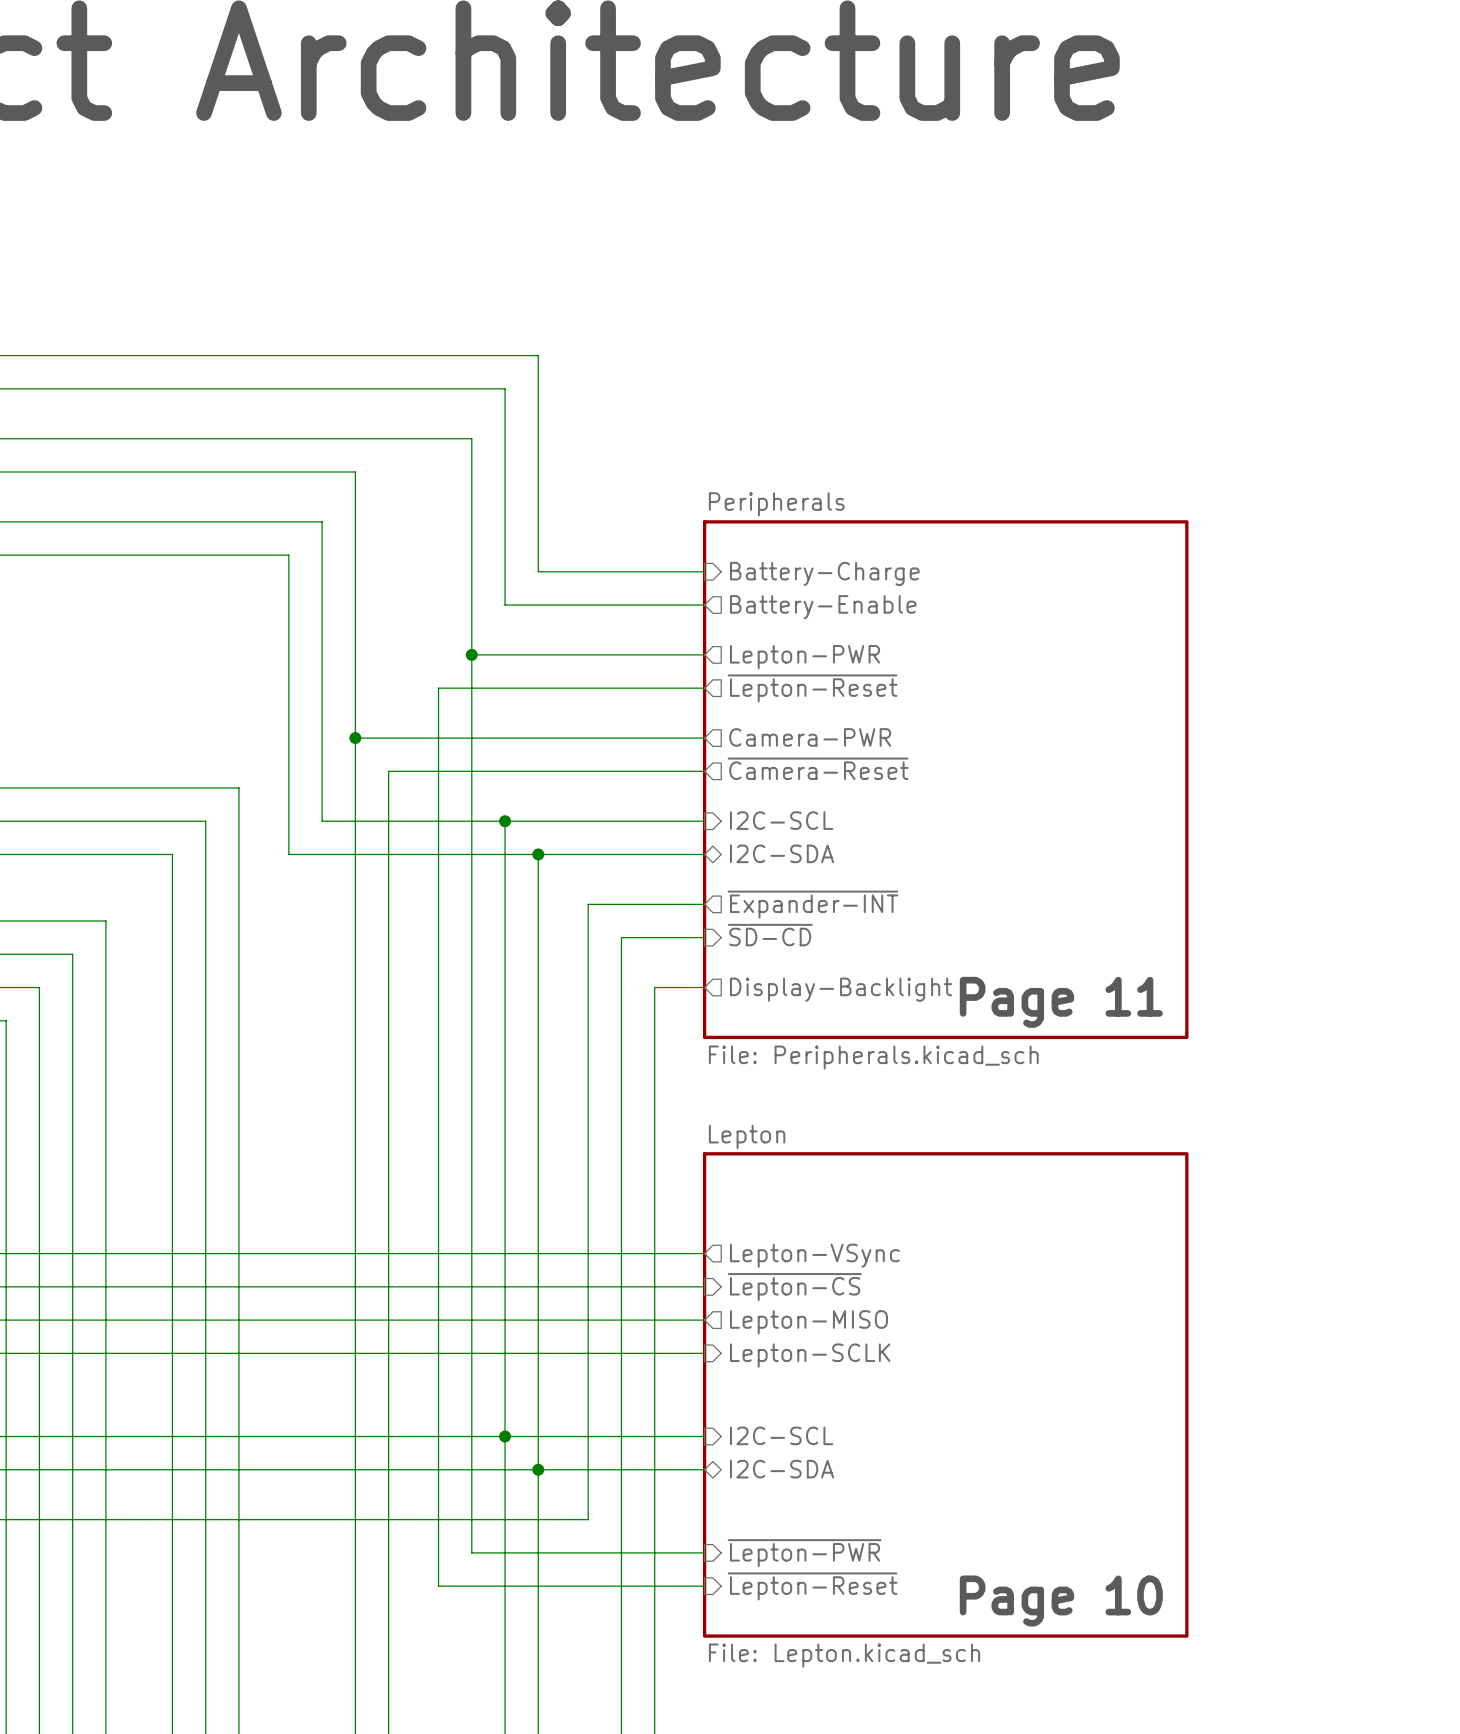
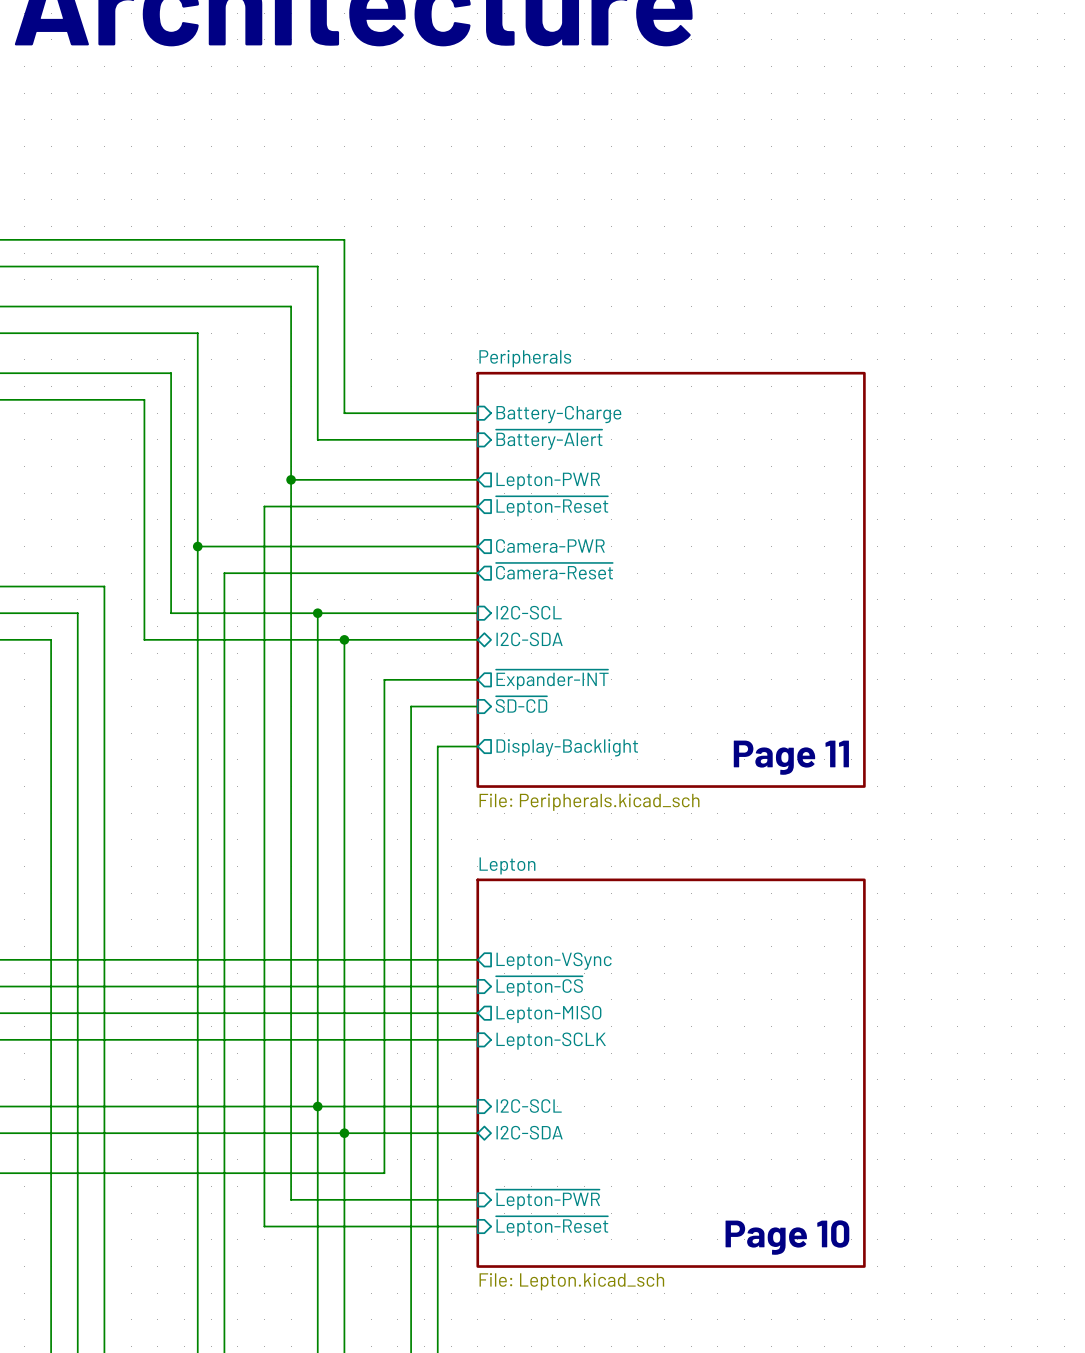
sheet pin shape: output (823, 607) -> input (549, 439)
sheet pin: Battery-Enable (823, 607) -> ~{Battery-Alert} (549, 439)

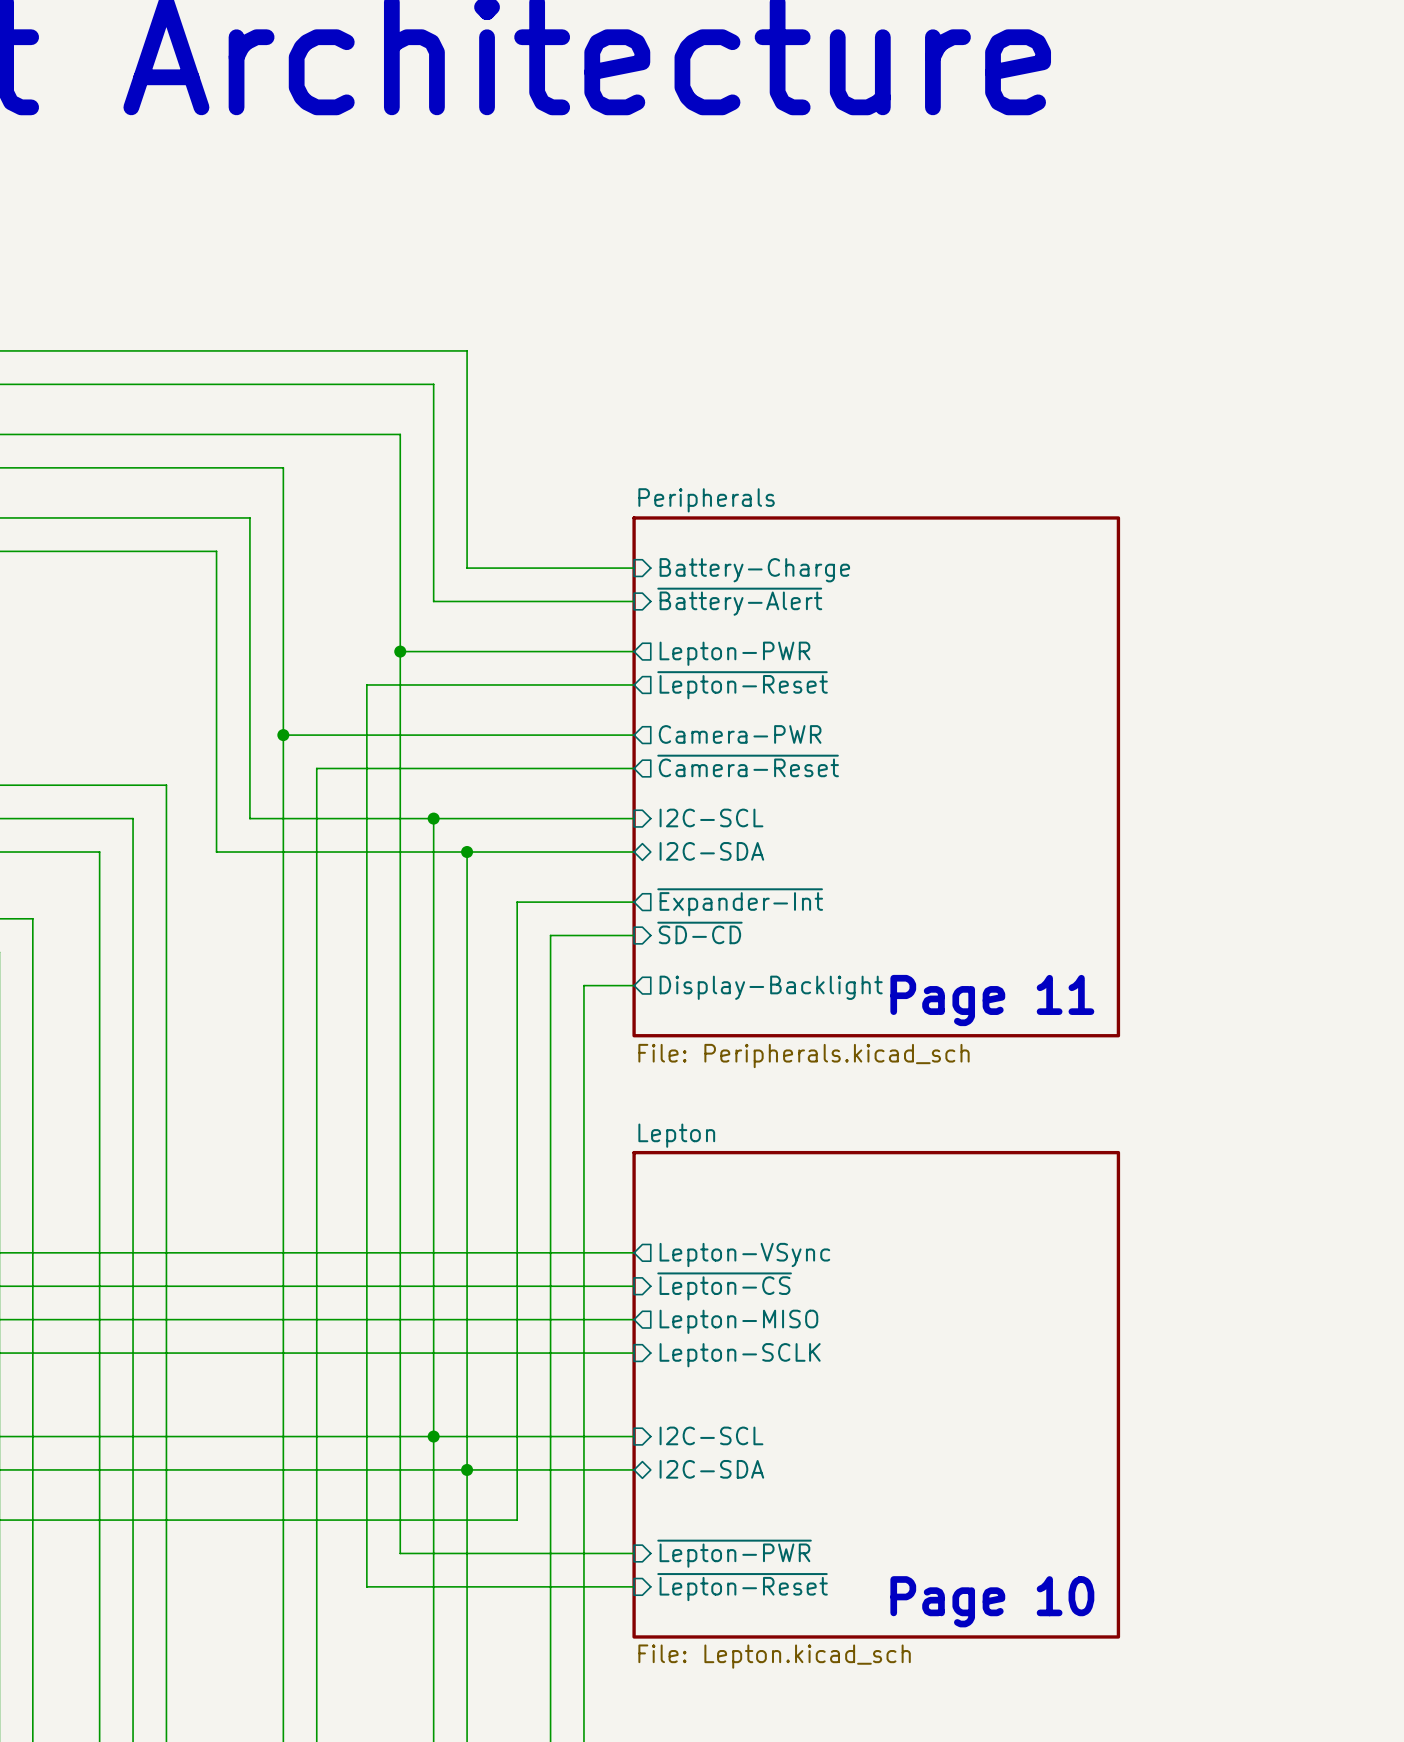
sheet pin: ~{Expander-INT} (552, 679) -> ~{Expander-Int} (740, 902)

